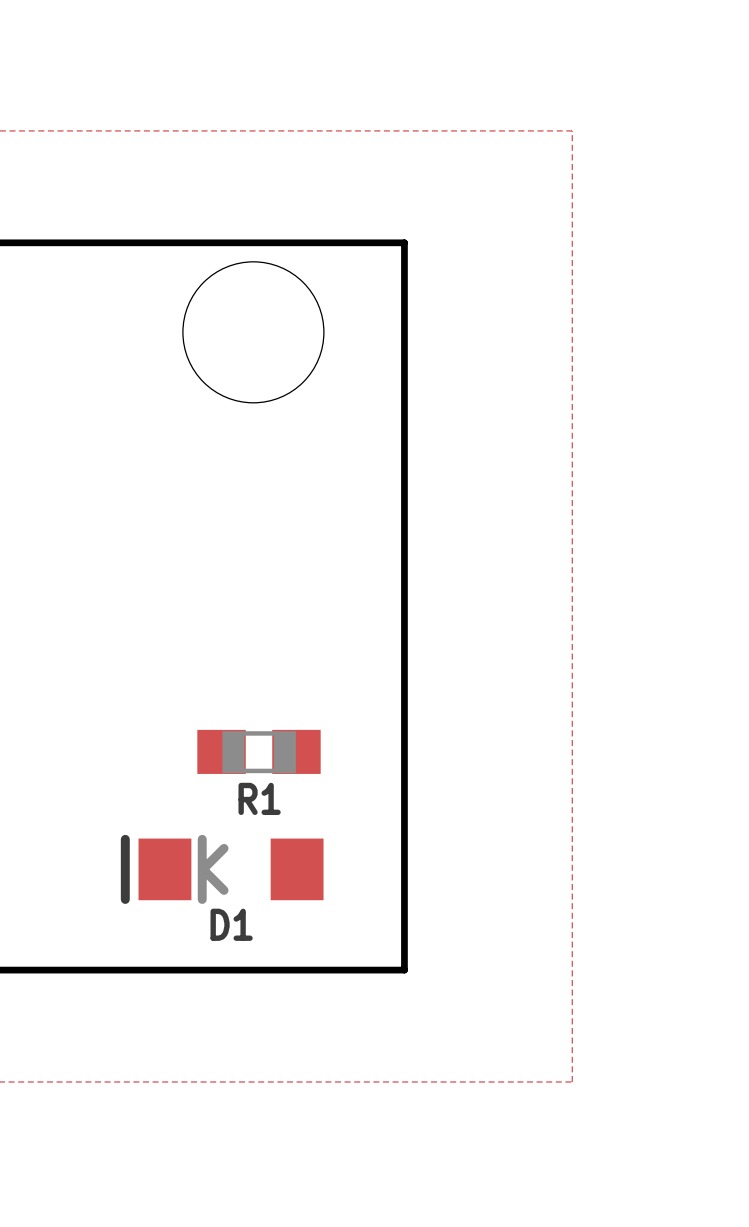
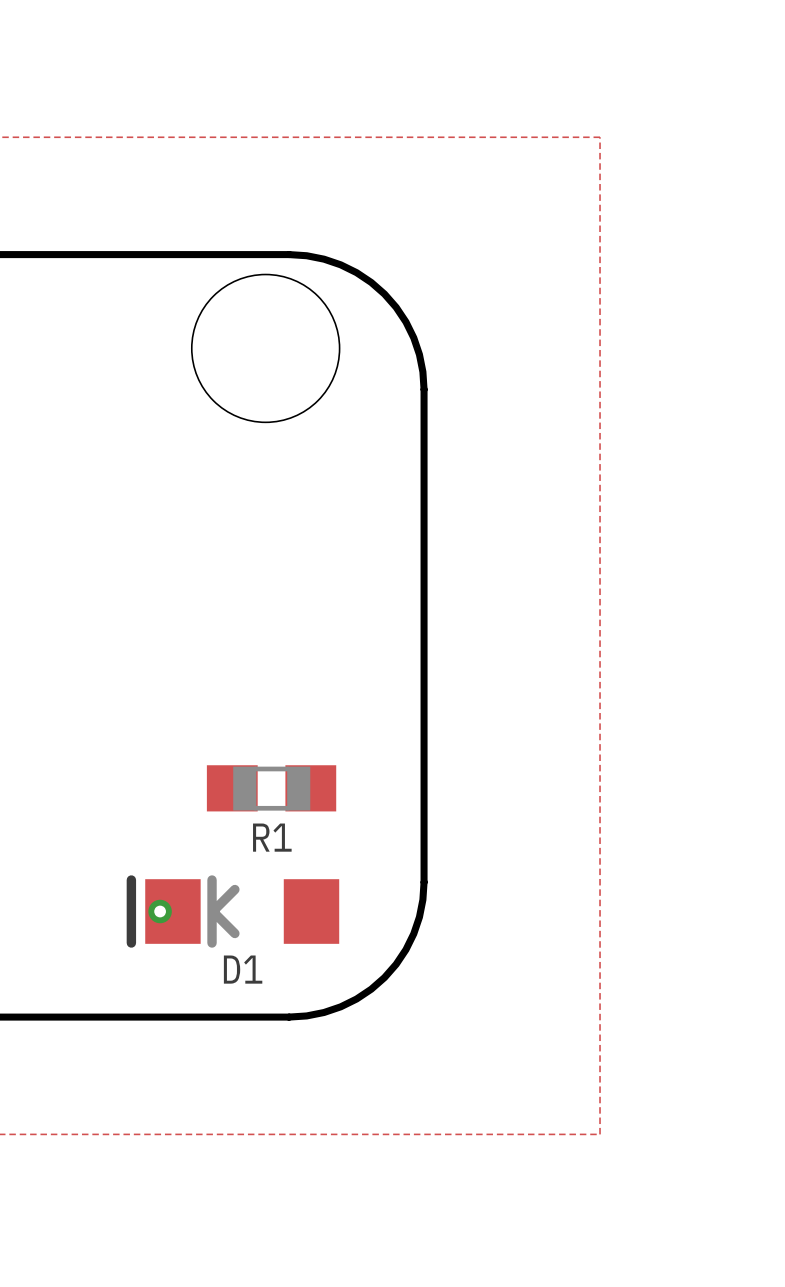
board edge: (275, 242) (404, 242) (404, 371) -> (289, 254) (324, 259) (340, 264) (356, 272) (384, 294) (405, 322) (413, 337) (419, 354) (424, 389)
board edge: (404, 841) (404, 970) (275, 970) -> (424, 882) (419, 917) (413, 933) (405, 949) (384, 977) (356, 999) (340, 1006) (324, 1012) (289, 1017)
via: none -> (160, 911)

